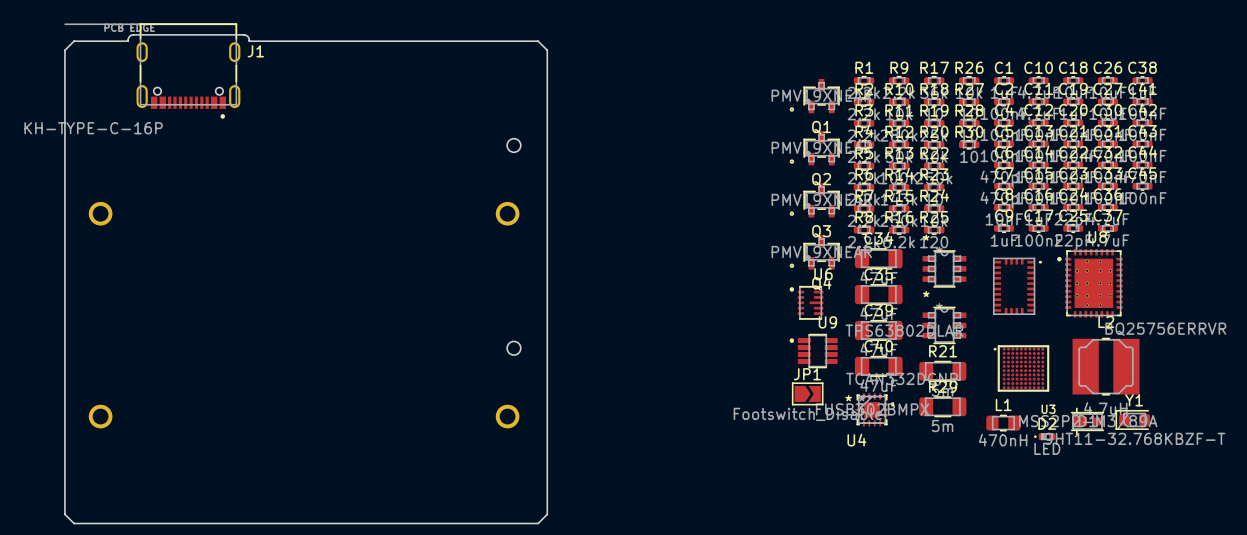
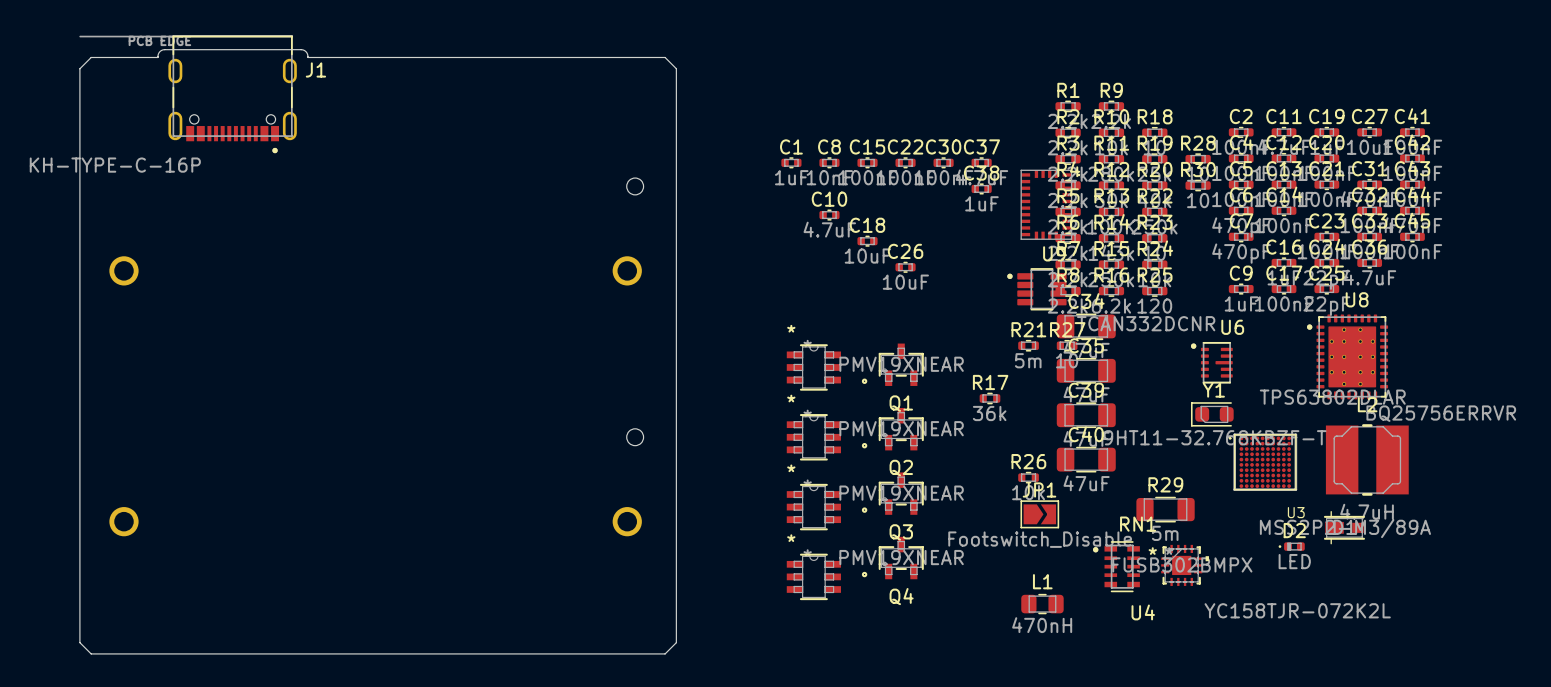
R17 footprint: [923, 76, 945, 86] -> [979, 392, 1001, 405]
R26 footprint: [958, 76, 980, 86] -> [1018, 471, 1039, 484]
C1 footprint: [994, 76, 1015, 86] -> [781, 157, 802, 169]
C10 footprint: [1028, 76, 1049, 86] -> [819, 209, 840, 221]
C18 footprint: [1063, 76, 1084, 86] -> [857, 235, 878, 247]
C26 footprint: [1097, 76, 1118, 86] -> [895, 261, 916, 273]
C38 footprint: [1132, 76, 1153, 86] -> [971, 183, 992, 195]
Q1 position: (814, 96) -> (892, 364)
R27 footprint: [958, 97, 980, 107] -> [1056, 339, 1078, 352]
C30 footprint: [1097, 118, 1118, 128] -> [933, 157, 954, 169]
Q2 position: (814, 148) -> (892, 429)
C22 footprint: [1063, 160, 1084, 170] -> [895, 157, 916, 169]
C15 footprint: [1028, 181, 1049, 191] -> [857, 157, 878, 169]
Q3 position: (814, 200) -> (892, 493)
C8 footprint: [994, 202, 1015, 212] -> [819, 157, 840, 169]
C37 footprint: [1097, 223, 1118, 233] -> [971, 157, 992, 169]
Q4 position: (814, 252) -> (892, 558)
part: (944, 268) -> none
part position: (1017, 286) -> (1050, 204)
part: none -> (813, 367)
U6 position: (806, 302) -> (1211, 362)
part: (944, 325) -> none
part: none -> (813, 437)
U9 position: (813, 351) -> (1036, 289)
R21 footprint: [919, 360, 967, 382] -> [1018, 339, 1039, 352]
JP1 position: (807, 393) -> (1039, 514)
part: none -> (813, 507)
U4 position: (874, 409) -> (1185, 565)
Y1 position: (1132, 419) -> (1212, 414)
L1 position: (1003, 423) -> (1042, 604)
U4 name position: U4 (856, 440) -> U4 (1143, 612)
RN1: none -> YC158TJR-072K2L (1116, 566)
part: none -> (813, 576)

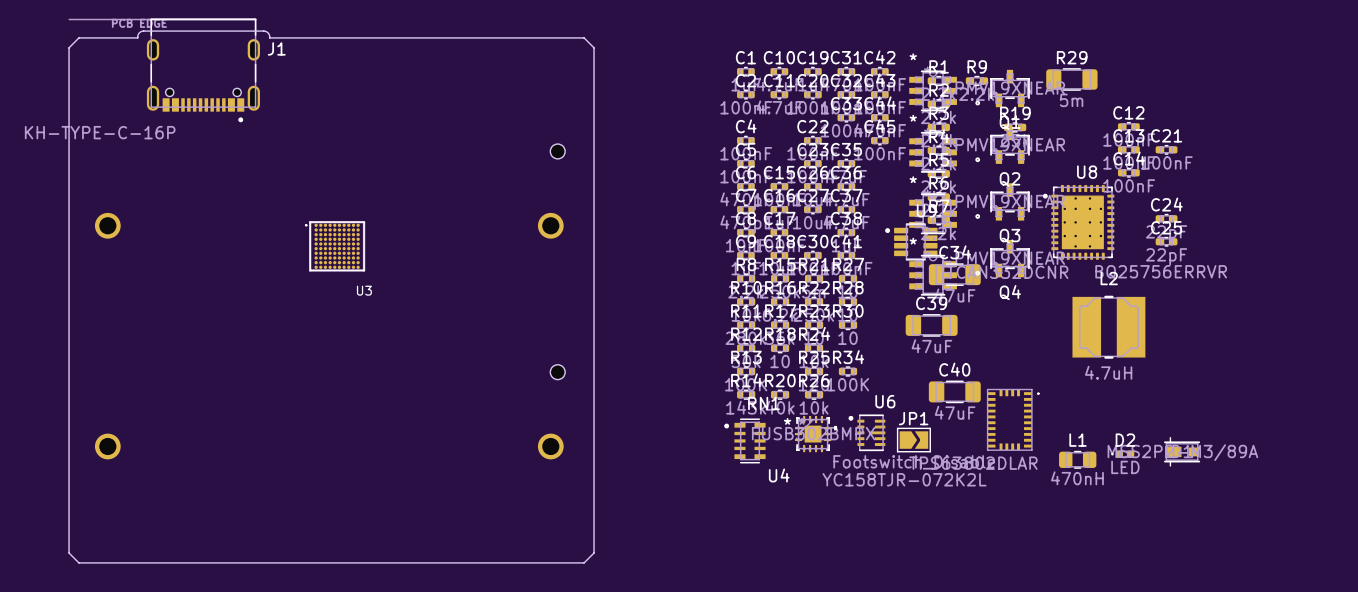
part: none -> (933, 90)
R10 footprint: [1098, 126, 1125, 139] -> [737, 296, 756, 307]
R18 footprint: [1142, 126, 1168, 139] -> [771, 343, 790, 354]
C2 footprint: [1228, 126, 1254, 138] -> [737, 89, 755, 100]
C11 footprint: [1271, 126, 1297, 138] -> [770, 89, 789, 100]
C19 footprint: [1314, 126, 1340, 138] -> [804, 66, 822, 77]
C27 footprint: [1357, 126, 1383, 138] -> [804, 204, 822, 215]
C41 footprint: [1400, 126, 1425, 138] -> [837, 250, 856, 261]
C4 footprint: [1228, 152, 1254, 165] -> [737, 135, 755, 146]
C20 footprint: [1314, 152, 1340, 165] -> [804, 89, 822, 100]
C42 footprint: [1400, 152, 1425, 165] -> [870, 66, 889, 77]
R11 footprint: [1098, 153, 1125, 165] -> [737, 319, 756, 331]
R28 footprint: [1185, 153, 1211, 165] -> [838, 296, 858, 307]
C1 position: (791, 162) -> (745, 71)
C8 position: (829, 162) -> (745, 232)
C15 position: (867, 162) -> (779, 186)
C22 position: (905, 162) -> (812, 140)
C30 position: (943, 162) -> (812, 255)
C37 position: (981, 162) -> (846, 209)
R12 footprint: [1098, 179, 1125, 192] -> [737, 343, 756, 354]
R20 footprint: [1142, 179, 1168, 192] -> [771, 389, 790, 400]
R30 footprint: [1185, 179, 1211, 192] -> [838, 319, 858, 331]
C5 footprint: [1228, 179, 1254, 191] -> [737, 158, 755, 169]
C31 footprint: [1357, 179, 1383, 191] -> [837, 66, 856, 77]
C43 footprint: [1400, 179, 1425, 191] -> [870, 89, 889, 100]
part: none -> (933, 152)
C38 position: (981, 188) -> (846, 232)
part position: (1050, 204) -> (1013, 419)
C6 footprint: [1228, 205, 1254, 217] -> [737, 181, 755, 192]
C32 footprint: [1357, 205, 1383, 217] -> [837, 89, 856, 100]
C44 footprint: [1400, 205, 1425, 217] -> [870, 112, 889, 123]
R13 footprint: [1098, 206, 1125, 218] -> [737, 366, 756, 377]
R22 footprint: [1142, 206, 1168, 218] -> [804, 296, 824, 307]
C10 position: (829, 215) -> (779, 71)
C7 footprint: [1228, 231, 1254, 243] -> [737, 204, 755, 215]
C23 footprint: [1314, 231, 1340, 243] -> [804, 158, 822, 169]
C33 footprint: [1357, 231, 1383, 243] -> [837, 112, 856, 123]
C45 footprint: [1400, 231, 1425, 243] -> [870, 135, 889, 146]
R14 footprint: [1098, 232, 1125, 245] -> [737, 389, 756, 400]
R23 footprint: [1142, 232, 1168, 245] -> [804, 319, 824, 331]
C18 position: (867, 241) -> (779, 255)
part: none -> (933, 213)
C16 footprint: [1271, 257, 1297, 269] -> [770, 204, 789, 215]
C36 footprint: [1357, 257, 1383, 269] -> [837, 181, 856, 192]
R15 footprint: [1098, 258, 1125, 271] -> [771, 273, 790, 284]
R24 footprint: [1142, 258, 1168, 271] -> [804, 343, 824, 354]
C26 position: (905, 267) -> (812, 186)
C9 footprint: [1228, 283, 1254, 295] -> [737, 250, 755, 261]
C17 footprint: [1271, 283, 1297, 295] -> [770, 227, 789, 238]
R8 footprint: [1055, 285, 1081, 297] -> [737, 273, 756, 284]
R16 footprint: [1098, 285, 1125, 297] -> [771, 296, 790, 307]
R25 footprint: [1142, 285, 1168, 297] -> [804, 366, 824, 377]
part: none -> (933, 275)
R21 position: (1028, 345) -> (814, 278)
R27 position: (1067, 345) -> (848, 278)
U8 position: (1347, 356) -> (1078, 222)
C35 footprint: [1056, 357, 1116, 384] -> [837, 158, 856, 169]
U6 position: (1211, 362) -> (867, 432)
Q1 position: (892, 364) -> (1002, 88)
part: (813, 367) -> none
R17 position: (989, 398) -> (780, 325)
Y1: 9HT11-32.768KBZF-T (1212, 414) -> none
C39 position: (1086, 415) -> (931, 325)
Q2 position: (892, 429) -> (1002, 145)
R34: none -> 100K (848, 371)
part: (813, 437) -> none
L2 position: (1367, 459) -> (1108, 327)
U3 position: (1263, 462) -> (335, 246)
R26 position: (1028, 477) -> (814, 394)
Q3 position: (892, 493) -> (1002, 201)
part: (813, 507) -> none
R29 position: (1165, 509) -> (1071, 79)
D2 position: (1291, 546) -> (1122, 454)
Q4 position: (892, 558) -> (1002, 258)
U4 position: (1185, 565) -> (816, 434)
RN1 position: (1116, 566) -> (744, 440)
part: (813, 576) -> none
L1 position: (1042, 604) -> (1077, 459)

